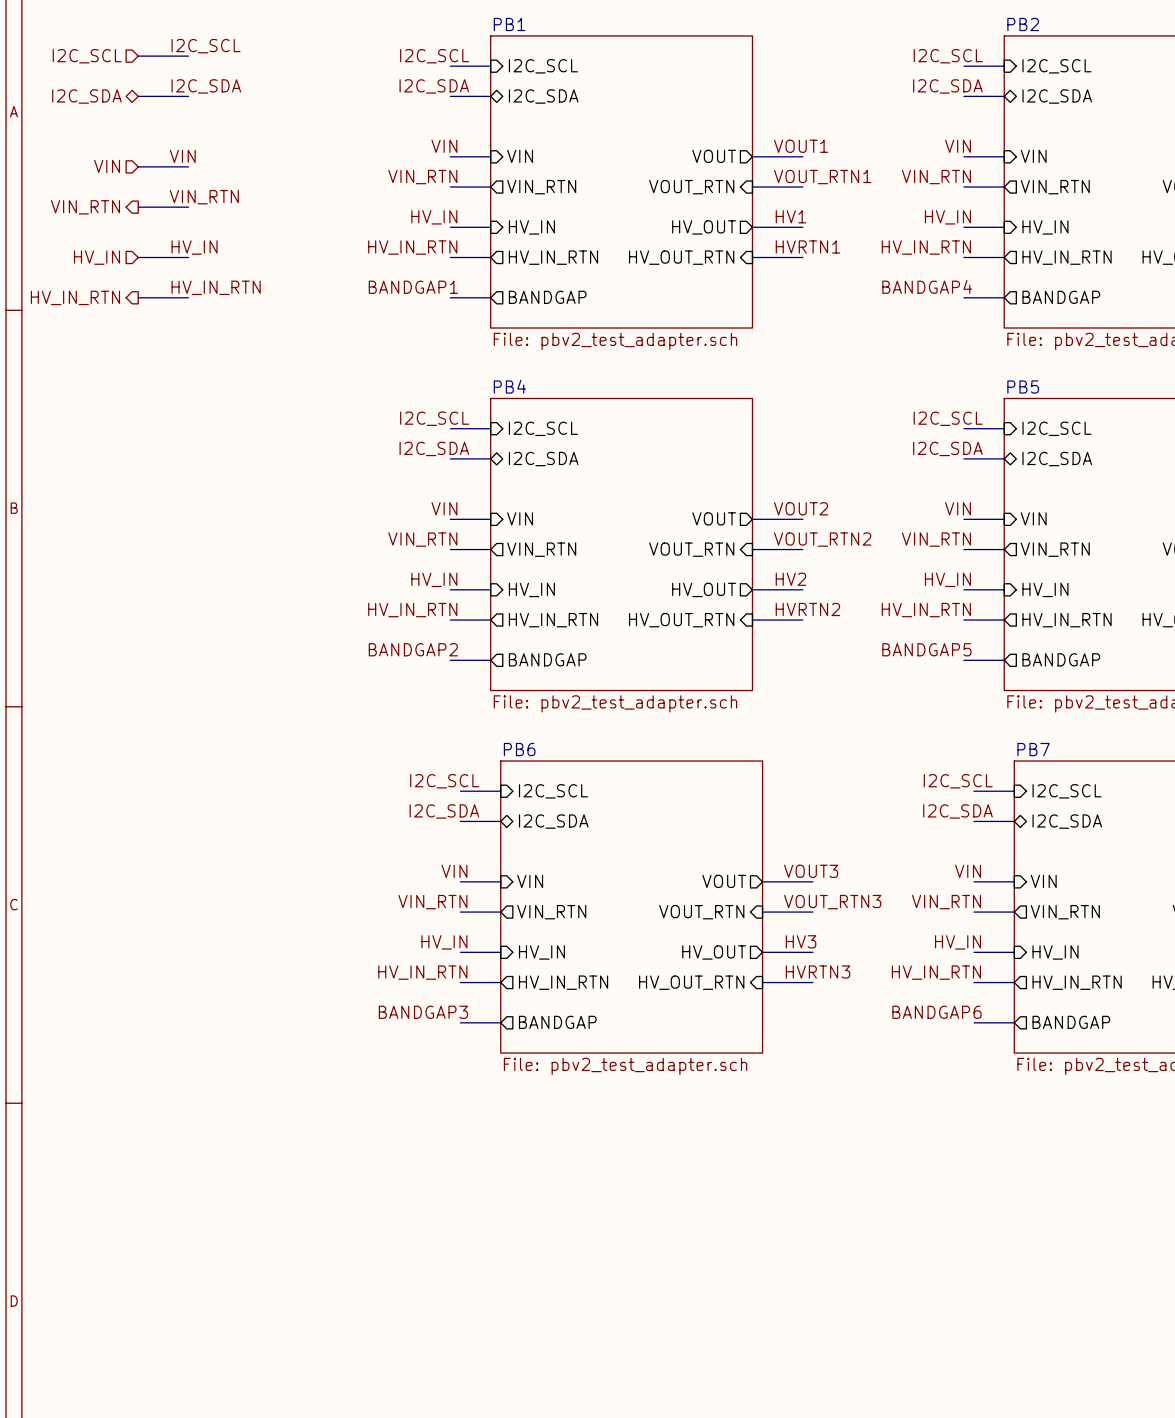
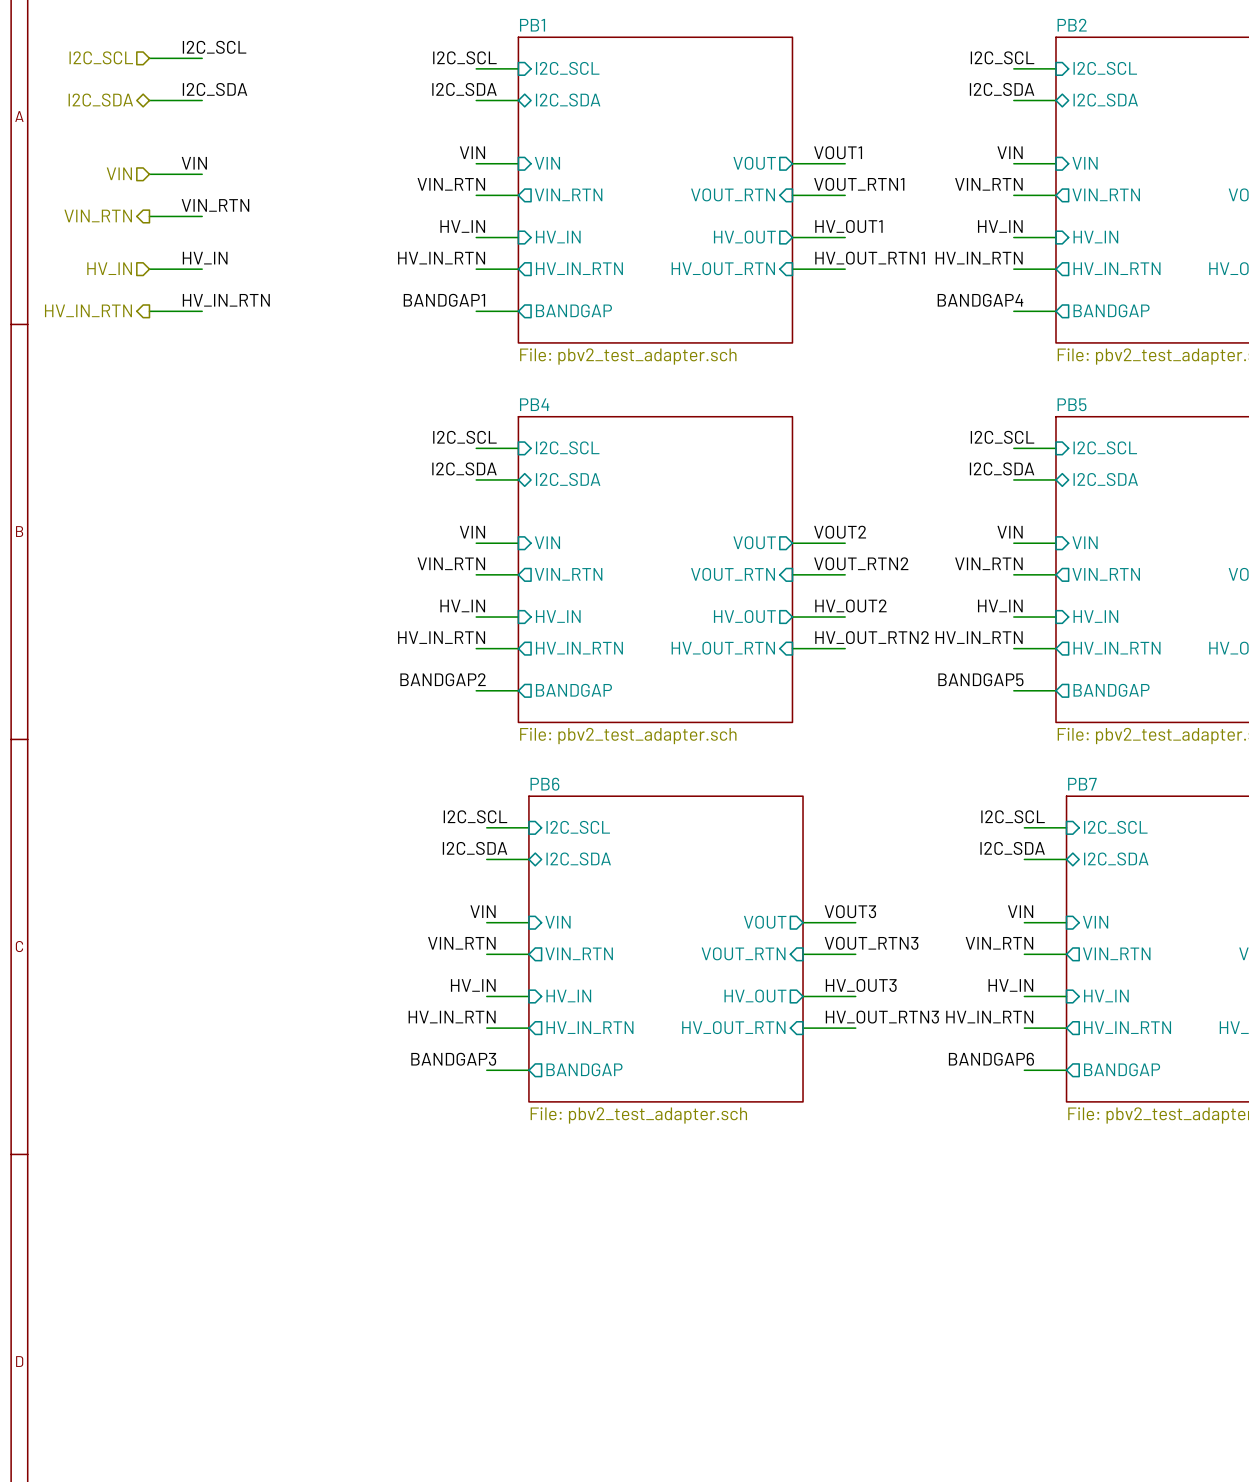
label: HV1 (790, 216) -> HV_OUT1 (848, 226)
label: HVRTN1 (807, 246) -> HV_OUT_RTN1 (870, 258)
label: HV2 (790, 579) -> HV_OUT2 (850, 605)
label: HVRTN2 (807, 609) -> HV_OUT_RTN2 (872, 637)
label: HV3 (801, 941) -> HV_OUT3 (861, 985)
label: HVRTN3 (818, 972) -> HV_OUT_RTN3 (882, 1017)

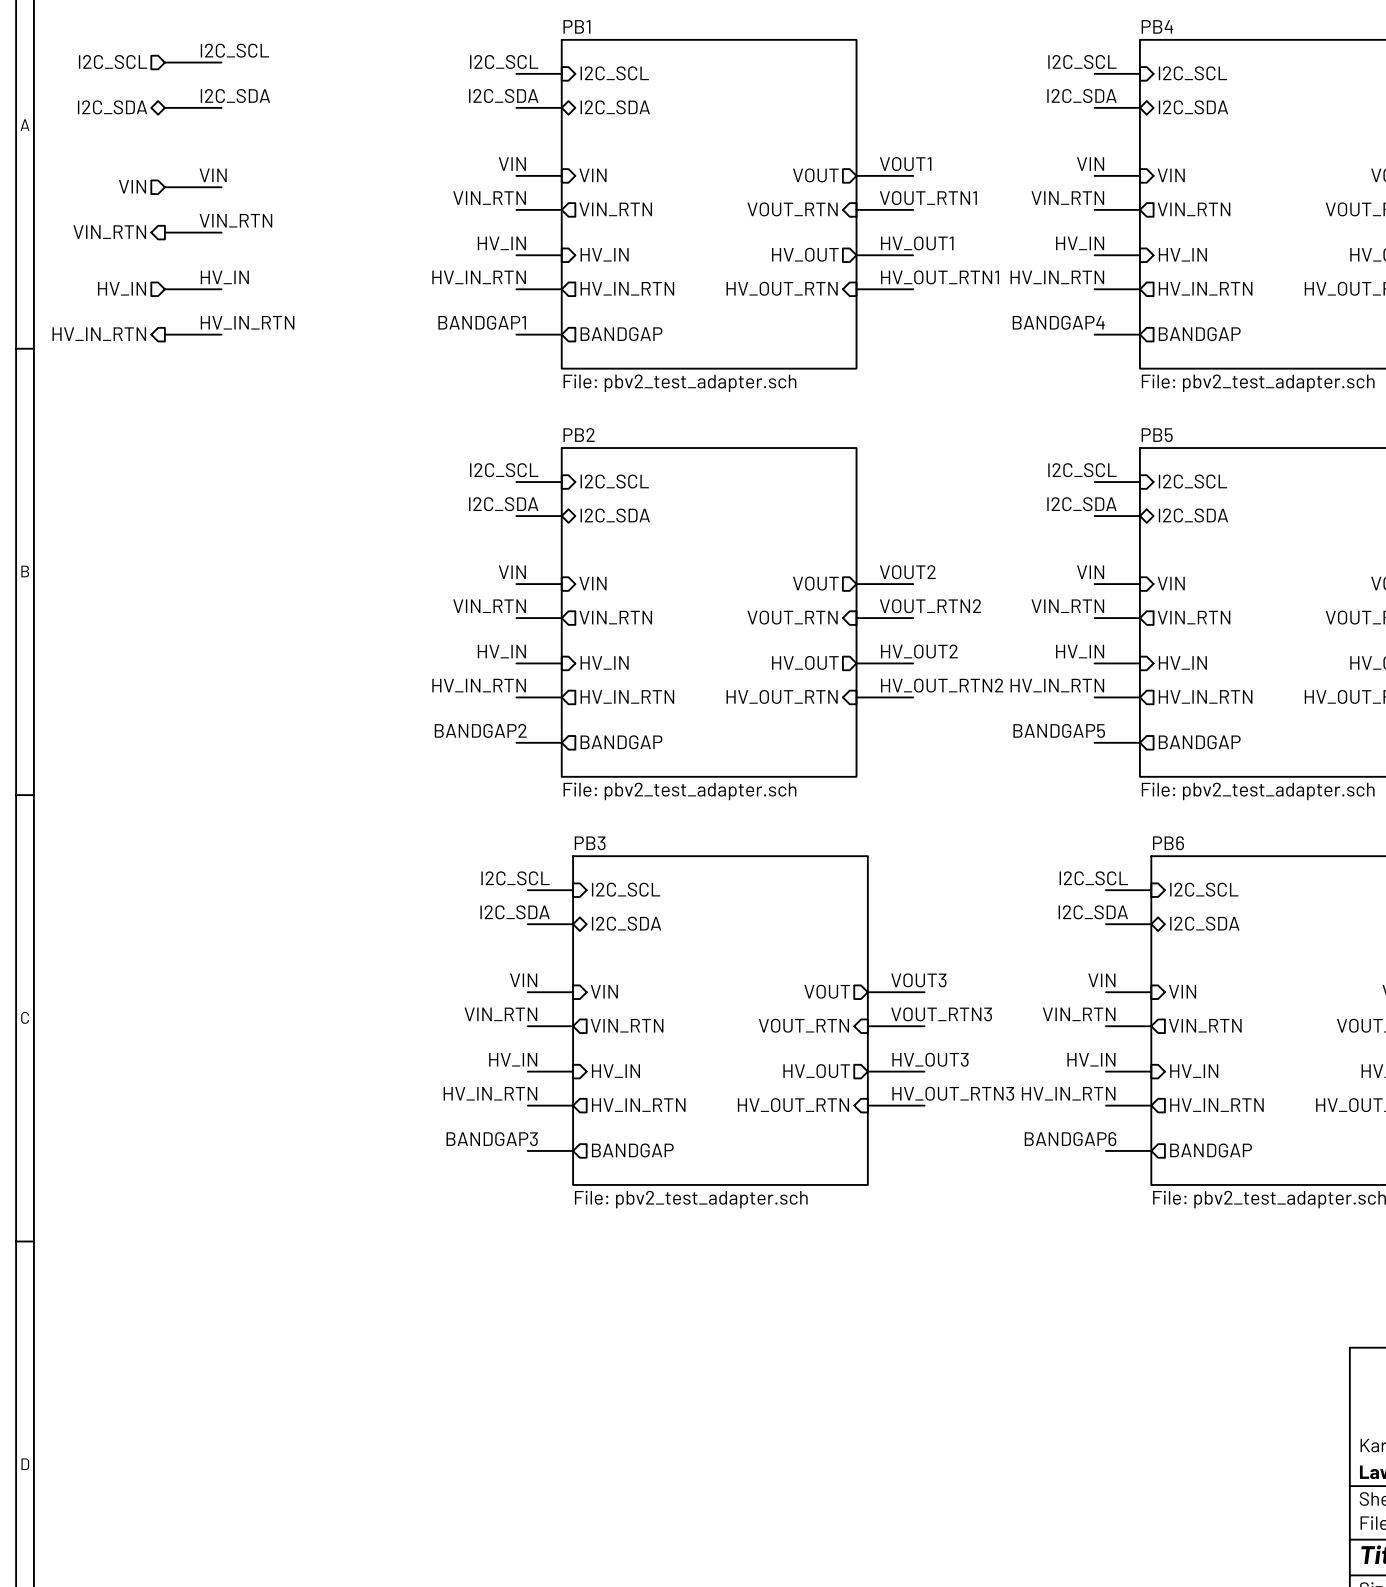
sheet PB2 name: PB2 (1072, 25) -> PB4 (1157, 26)
sheet PB4 name: PB4 (534, 404) -> PB2 (579, 435)
sheet PB6 name: PB6 (544, 784) -> PB3 (590, 843)
sheet PB7 name: PB7 (1082, 784) -> PB6 (1168, 843)

